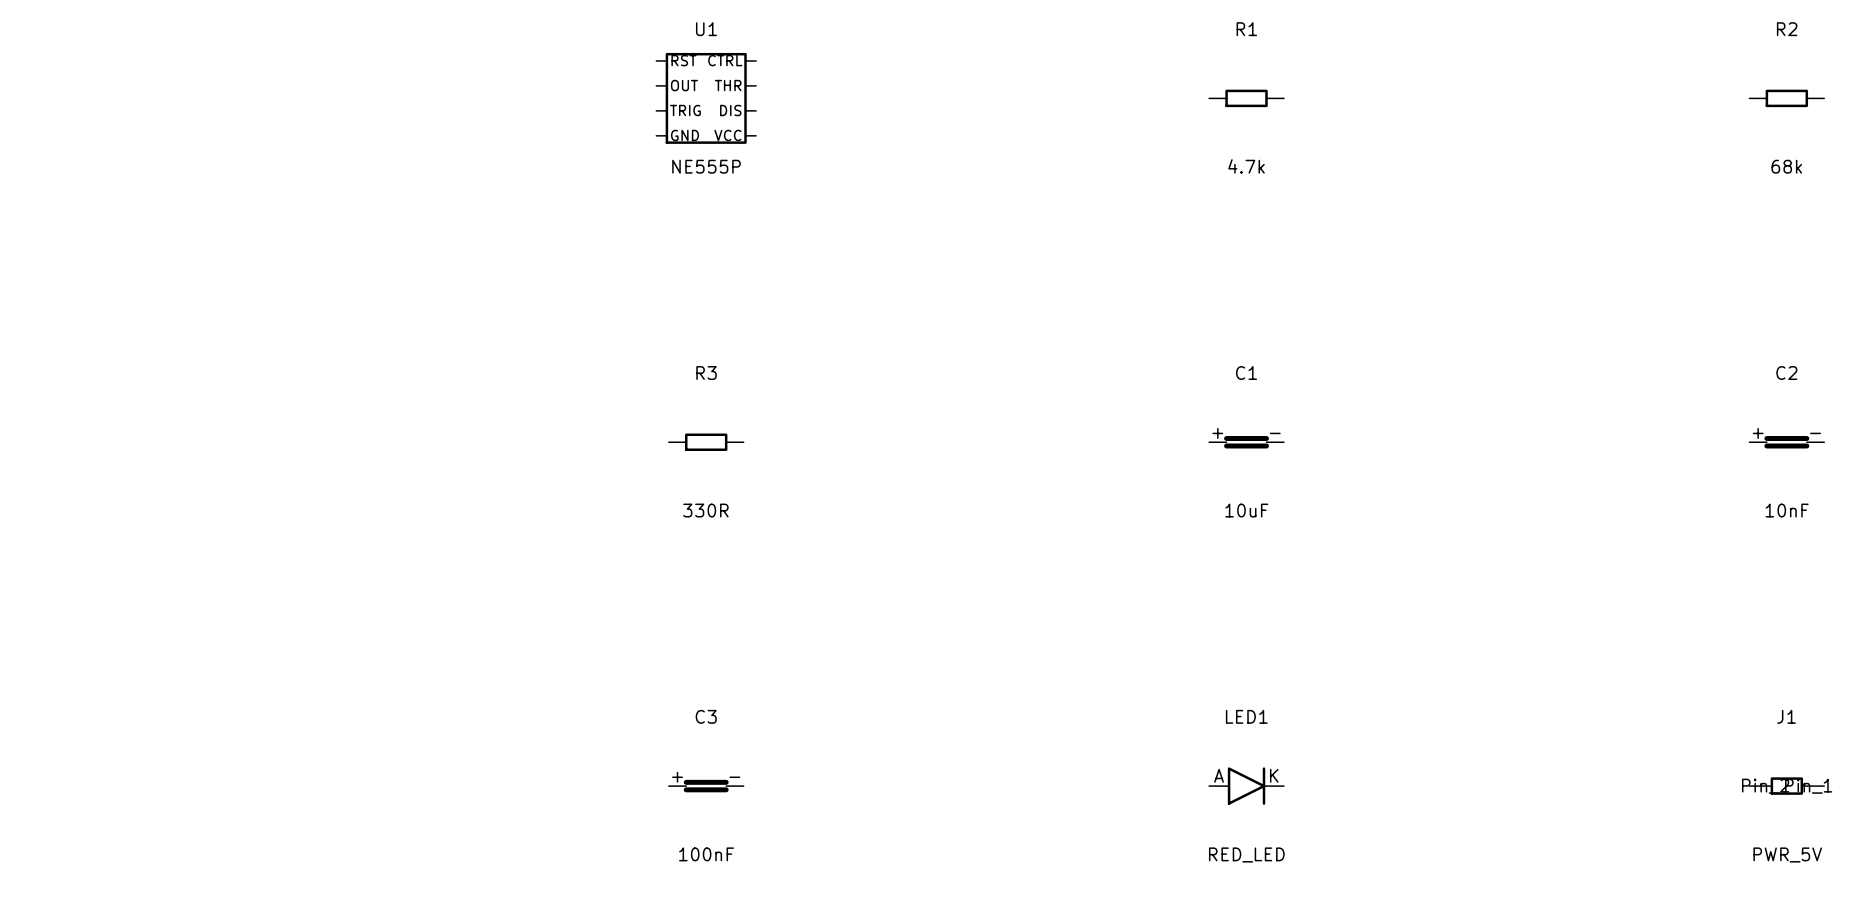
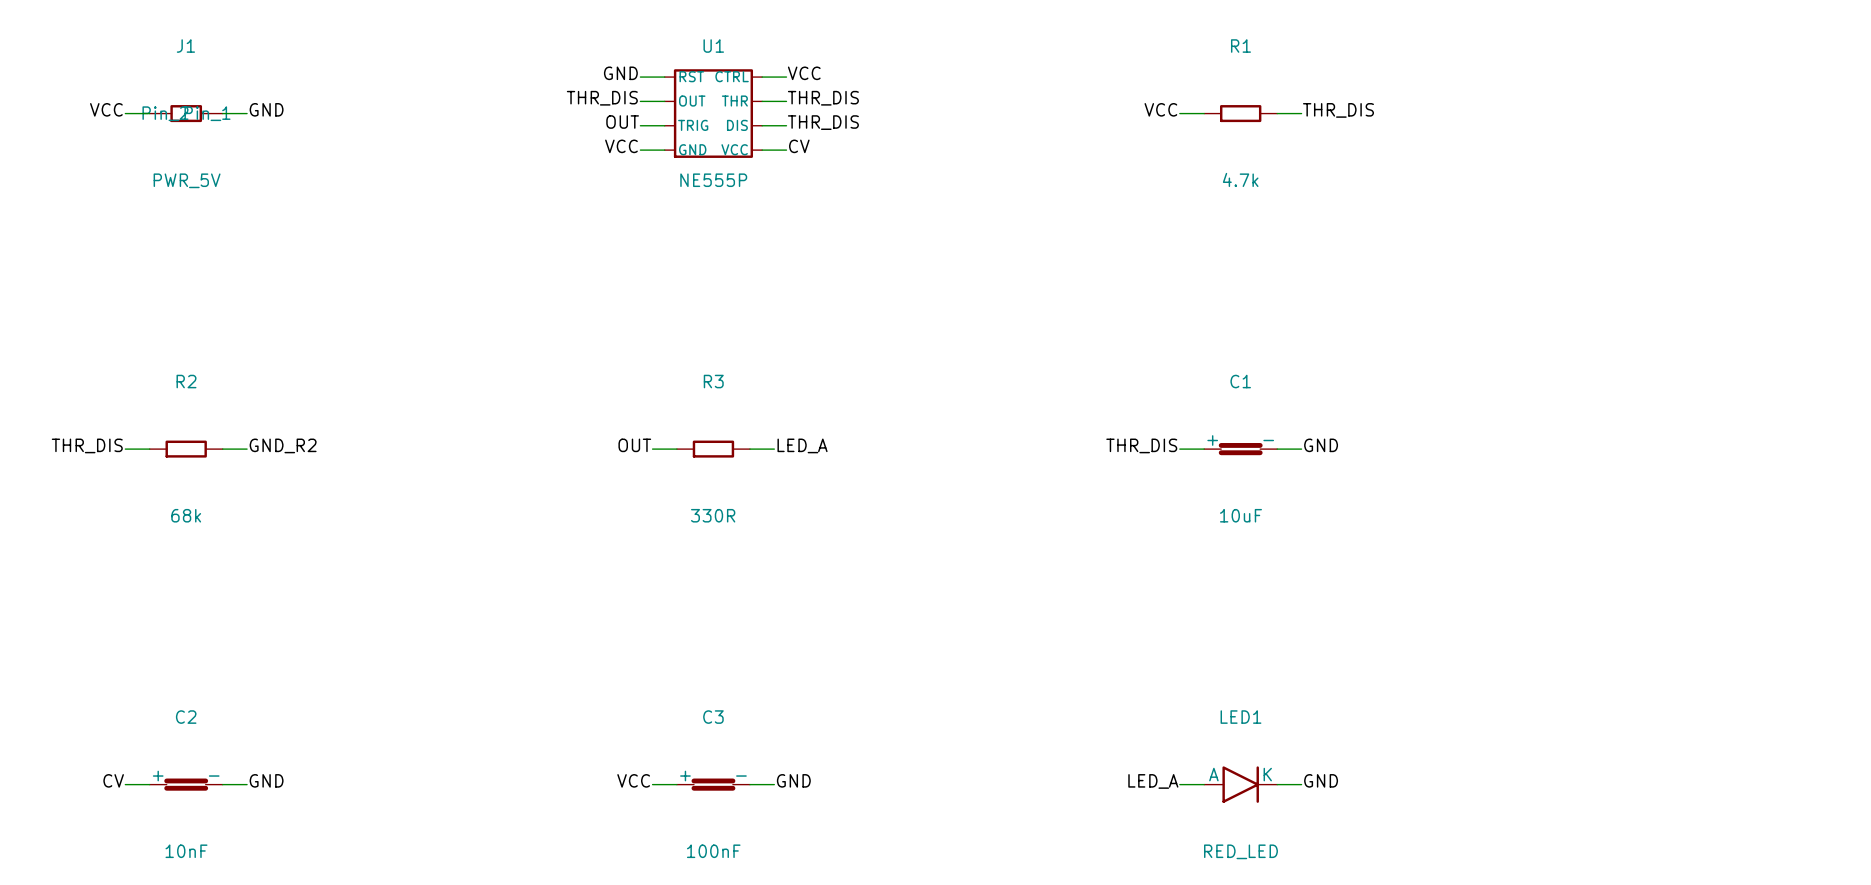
label: none -> GND (620, 73)
label: none -> VCC (804, 73)
wire: none -> (640, 77) (664, 77)
wire: none -> (762, 77) (786, 77)
label: none -> THR_DIS (602, 98)
label: none -> THR_DIS (823, 98)
wire: none -> (640, 101) (664, 101)
wire: none -> (762, 101) (786, 101)
label: none -> VCC (106, 109)
label: none -> GND (266, 109)
label: none -> VCC (1160, 109)
label: none -> THR_DIS (1338, 110)
wire: none -> (125, 113) (149, 113)
wire: none -> (222, 113) (247, 113)
wire: none -> (1179, 113) (1204, 113)
wire: none -> (1277, 113) (1301, 113)
R2 position: (1786, 98) -> (186, 449)
label: none -> OUT (622, 122)
label: none -> THR_DIS (823, 122)
wire: none -> (640, 125) (664, 125)
wire: none -> (762, 125) (786, 125)
label: none -> VCC (621, 146)
label: none -> CV (799, 146)
wire: none -> (640, 150) (664, 150)
wire: none -> (762, 150) (786, 150)
label: none -> OUT (634, 445)
label: none -> GND (1321, 445)
label: none -> THR_DIS (87, 445)
label: none -> GND_R2 (283, 445)
label: none -> LED_A (802, 445)
label: none -> THR_DIS (1141, 445)
wire: none -> (125, 449) (149, 449)
wire: none -> (222, 449) (247, 449)
wire: none -> (652, 449) (676, 449)
wire: none -> (749, 449) (774, 449)
wire: none -> (1179, 449) (1204, 449)
wire: none -> (1277, 449) (1301, 449)
C2 position: (1786, 442) -> (186, 784)
label: none -> CV (113, 780)
label: none -> GND (266, 780)
label: none -> VCC (633, 780)
label: none -> GND (793, 780)
label: none -> LED_A (1153, 781)
label: none -> GND (1321, 780)
wire: none -> (125, 784) (149, 784)
wire: none -> (222, 784) (247, 784)
wire: none -> (652, 784) (676, 784)
wire: none -> (749, 784) (774, 784)
wire: none -> (1179, 784) (1204, 784)
wire: none -> (1277, 784) (1301, 784)
J1 position: (1786, 786) -> (186, 113)

